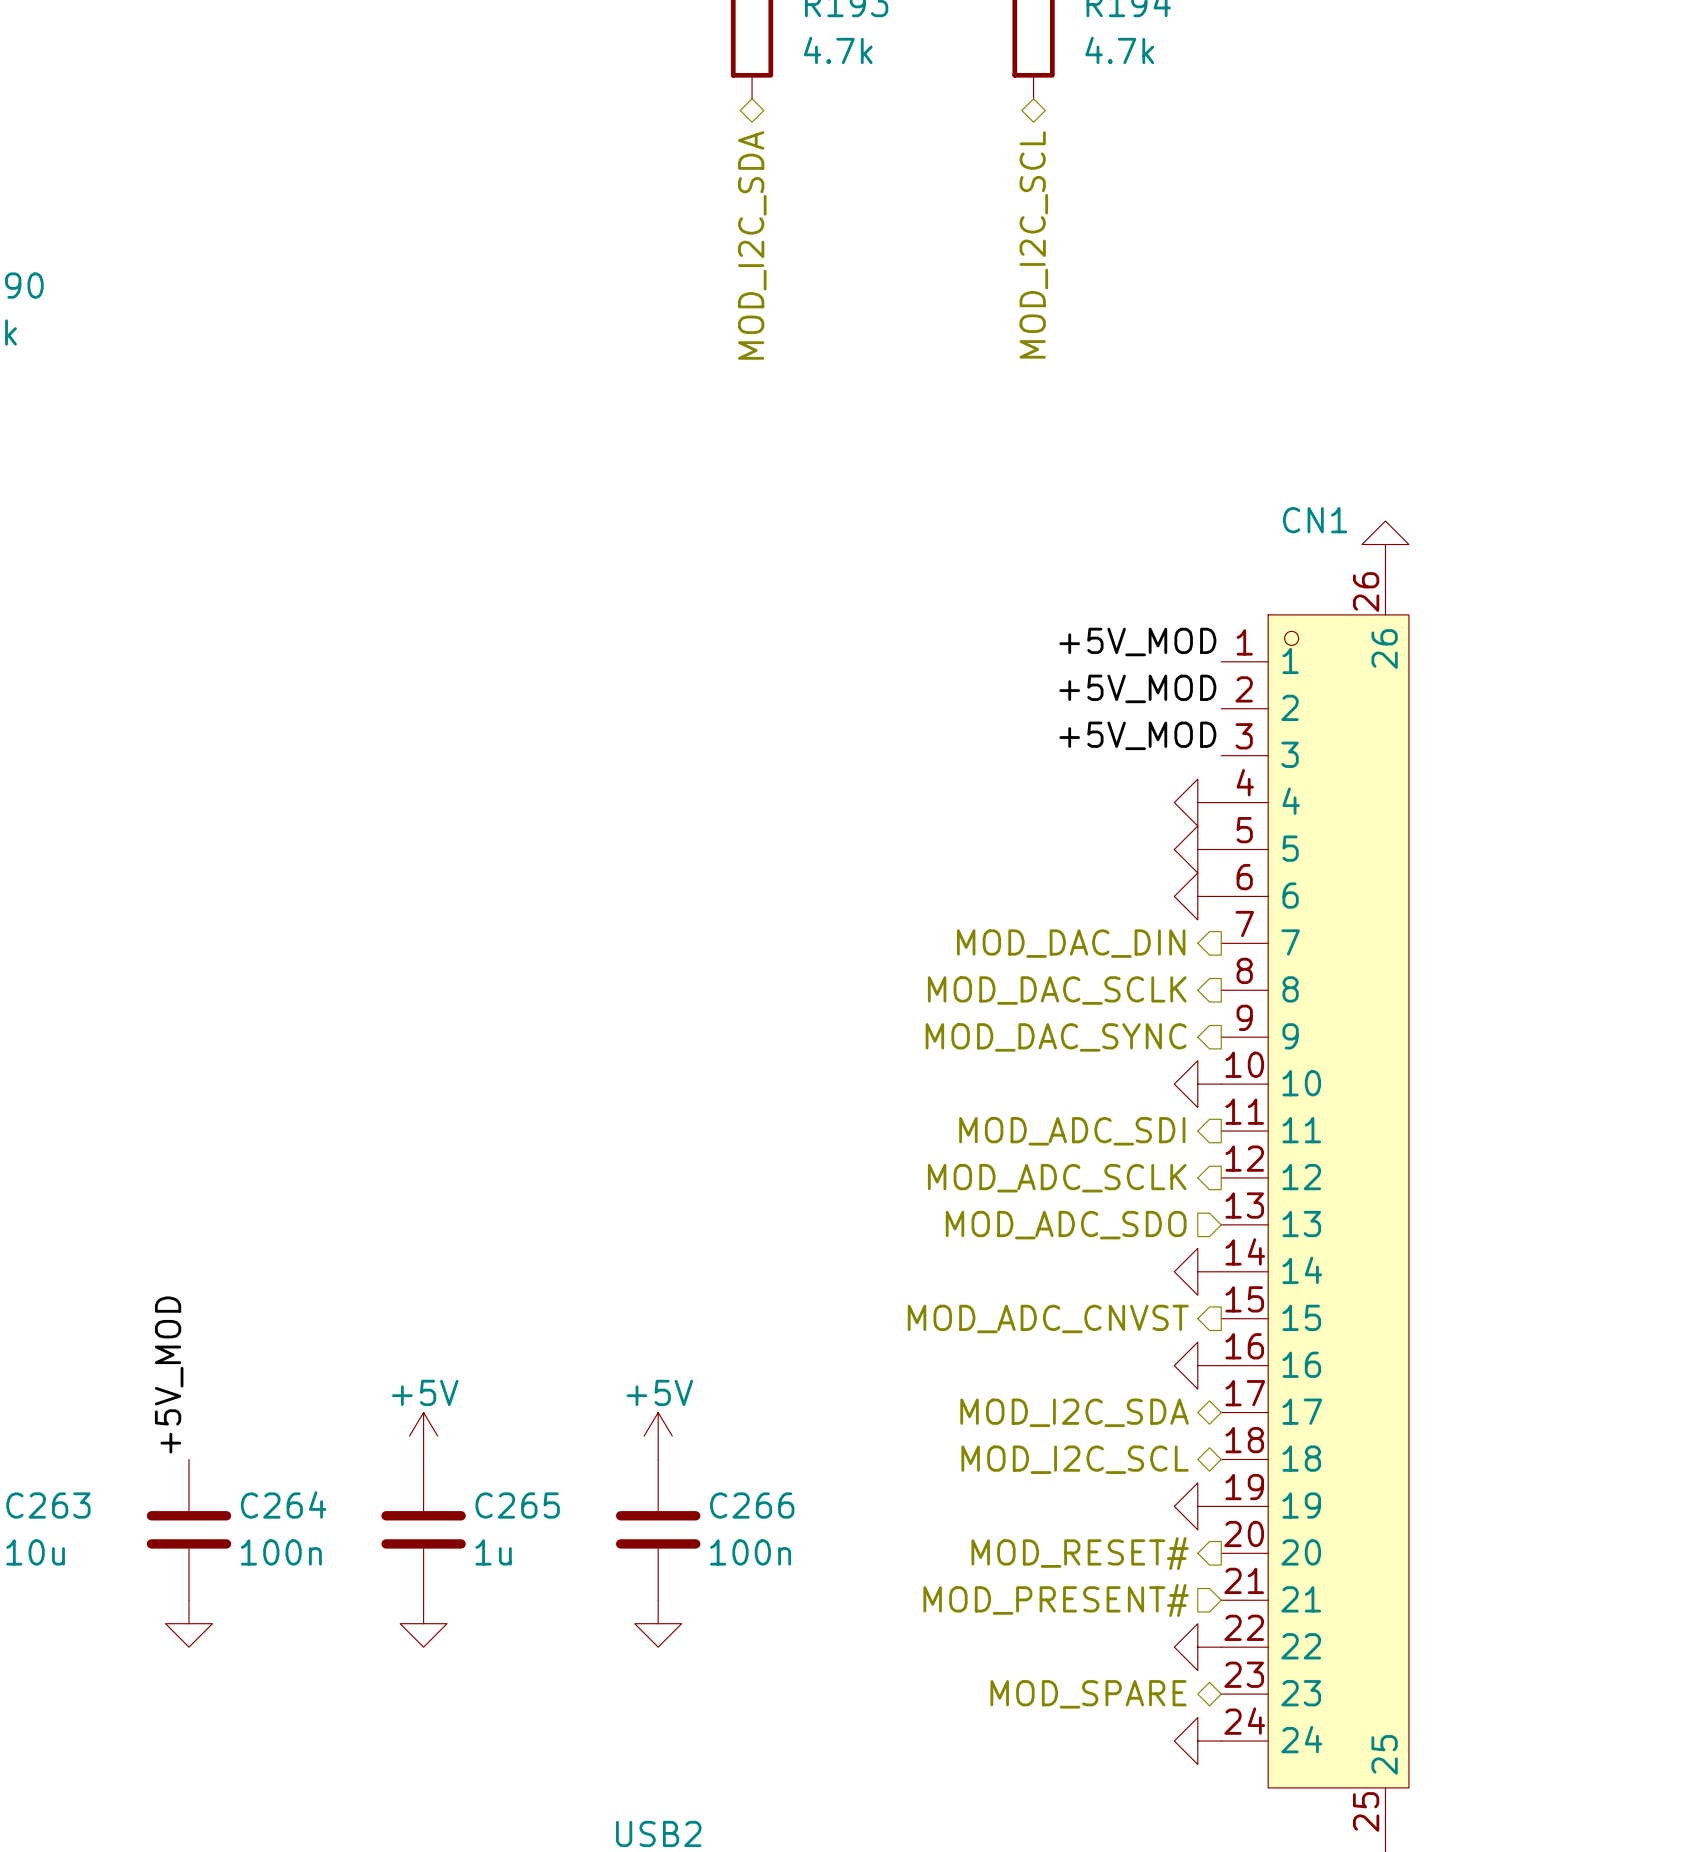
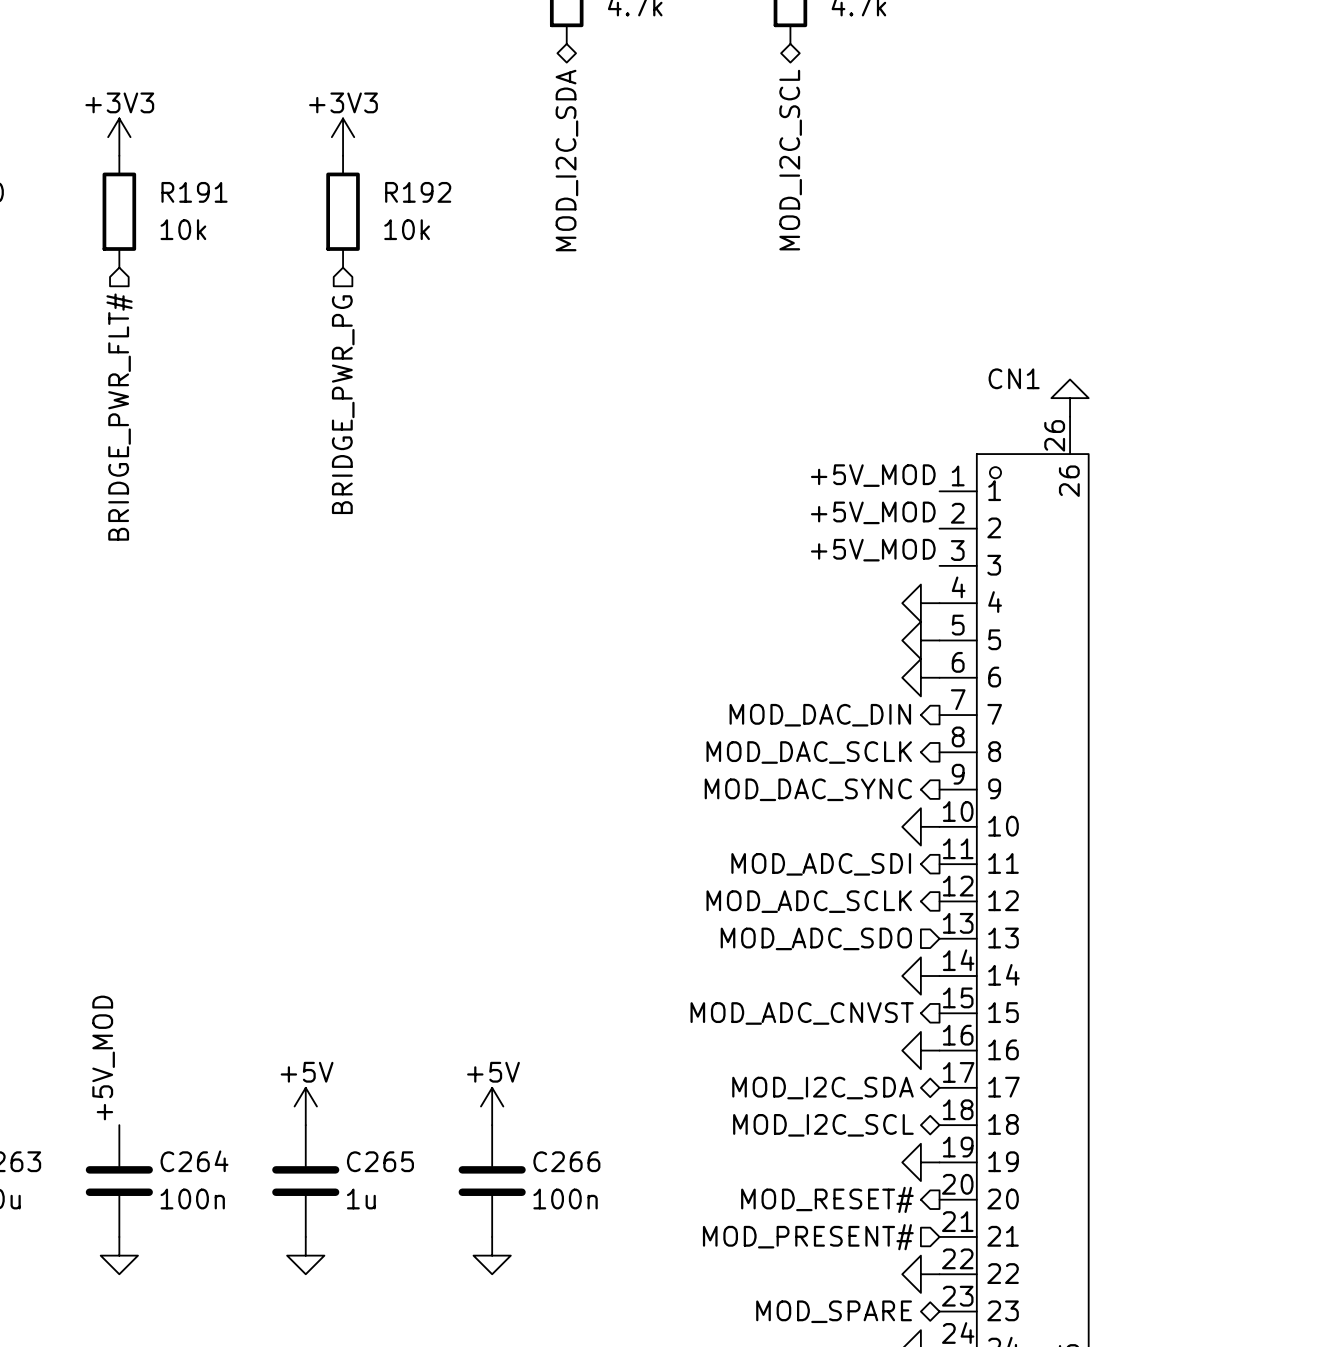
power symbol: none -> +3V3 (119, 137)
power symbol: none -> +3V3 (343, 137)
R191: none -> 10k (119, 211)
R192: none -> 10k (343, 211)
hierarchical label: none -> BRIDGE_PWR_PG (343, 404)
hierarchical label: none -> BRIDGE_PWR_FLT# (119, 417)

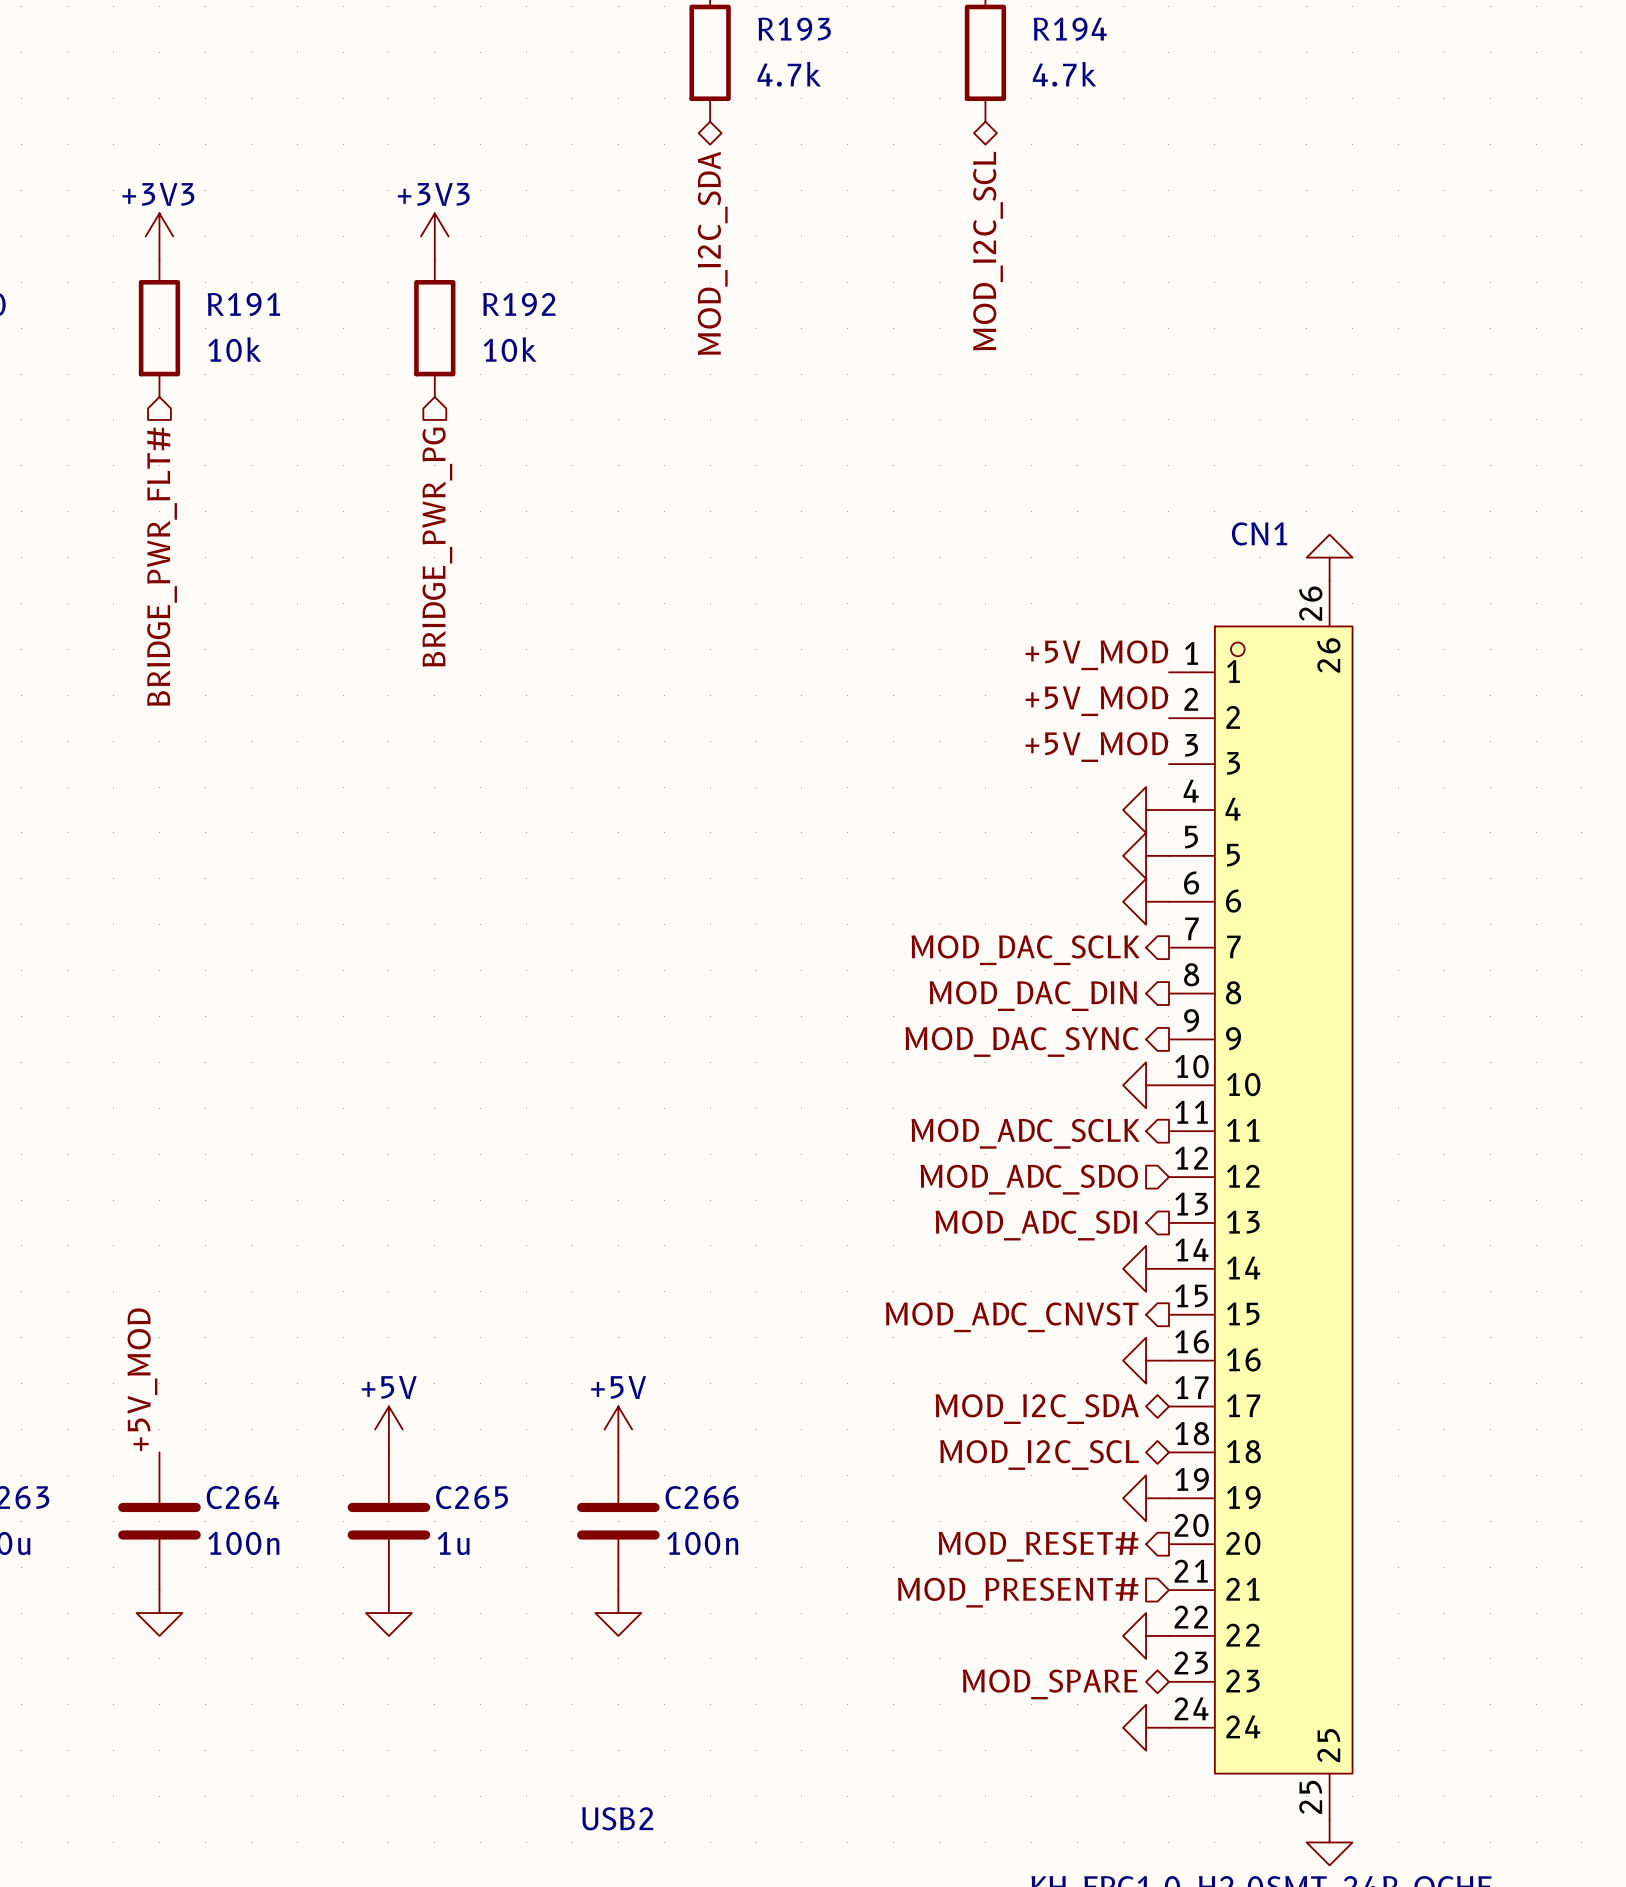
hierarchical label: MOD_DAC_DIN (820, 715) -> MOD_DAC_SCLK (1025, 950)
hierarchical label: MOD_DAC_SCLK (809, 752) -> MOD_DAC_DIN (1033, 996)
hierarchical label: MOD_ADC_SDI (821, 864) -> MOD_ADC_SCLK (1025, 1133)
hierarchical label shape: output (809, 901) -> input (1029, 1179)
hierarchical label: MOD_ADC_SCLK (809, 901) -> MOD_ADC_SDO (1029, 1179)
hierarchical label shape: input (816, 938) -> output (1036, 1225)
hierarchical label: MOD_ADC_SDO (816, 938) -> MOD_ADC_SDI (1036, 1225)

